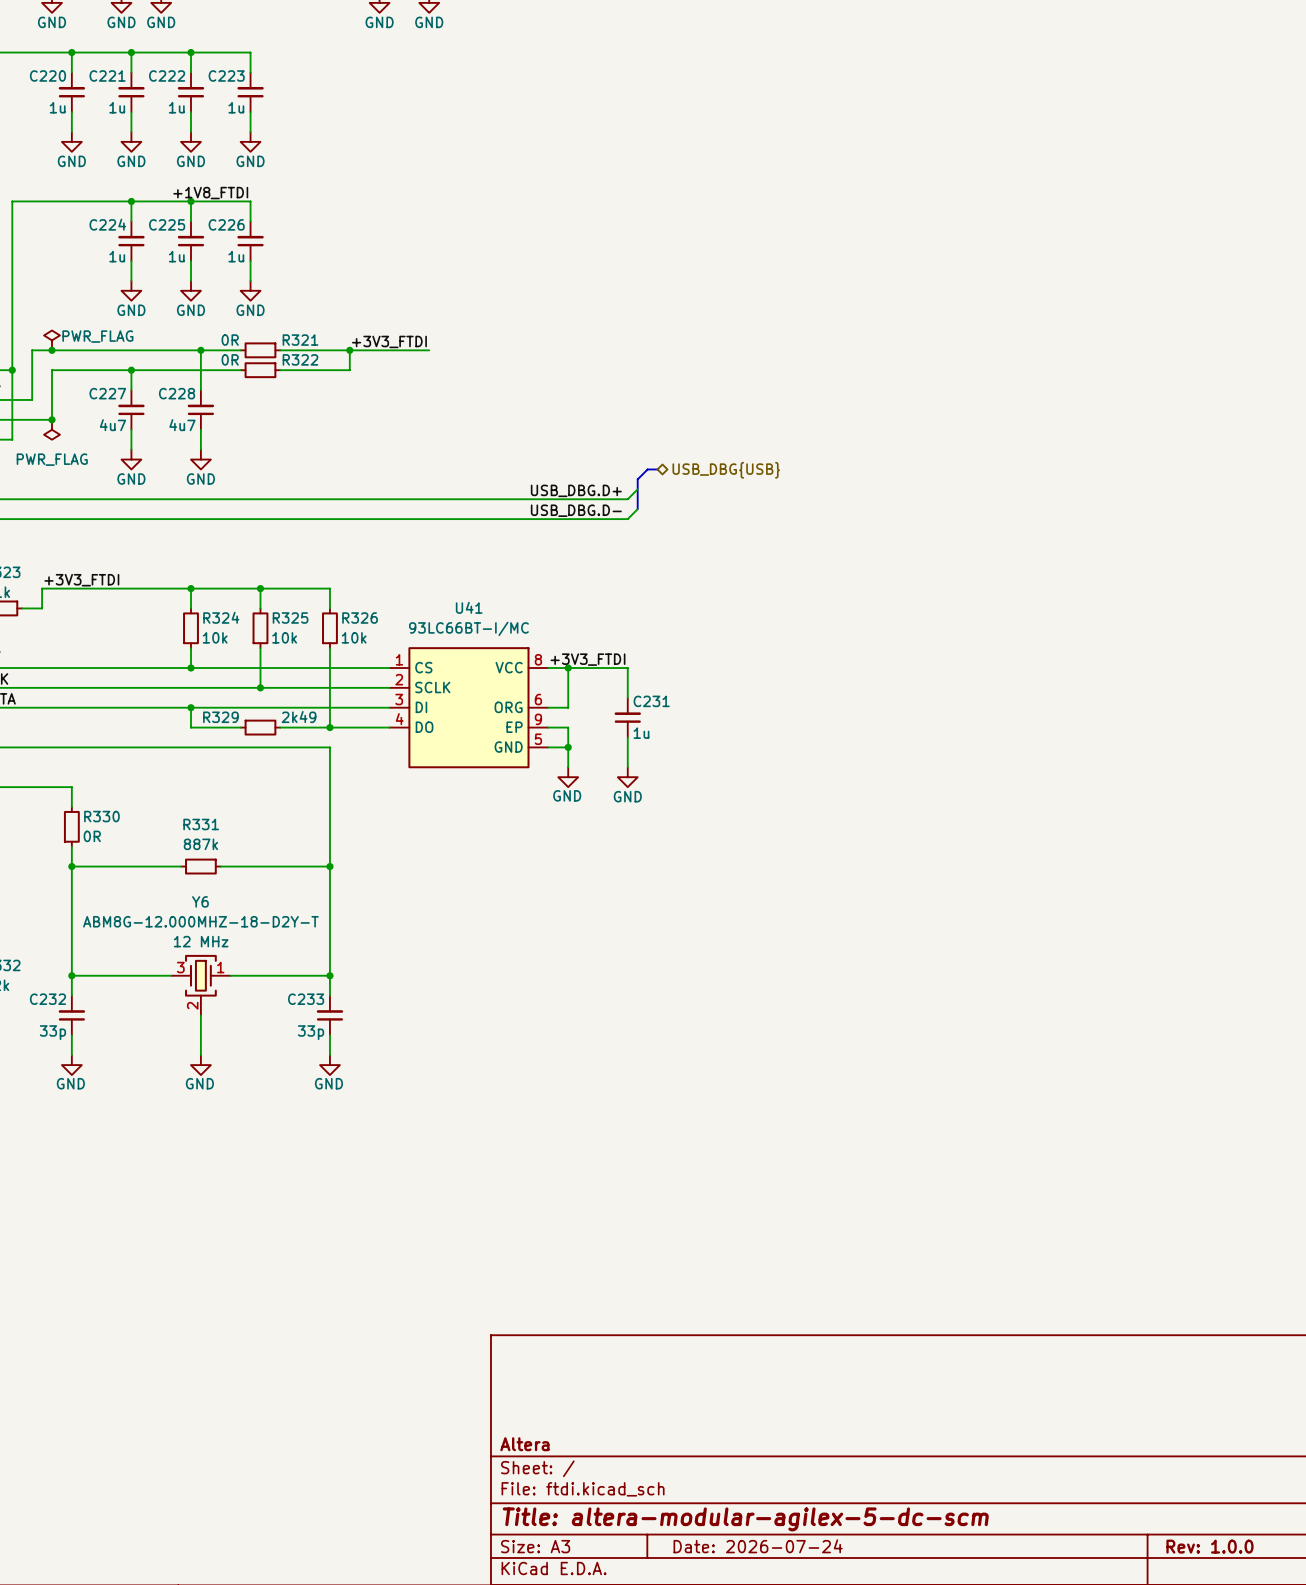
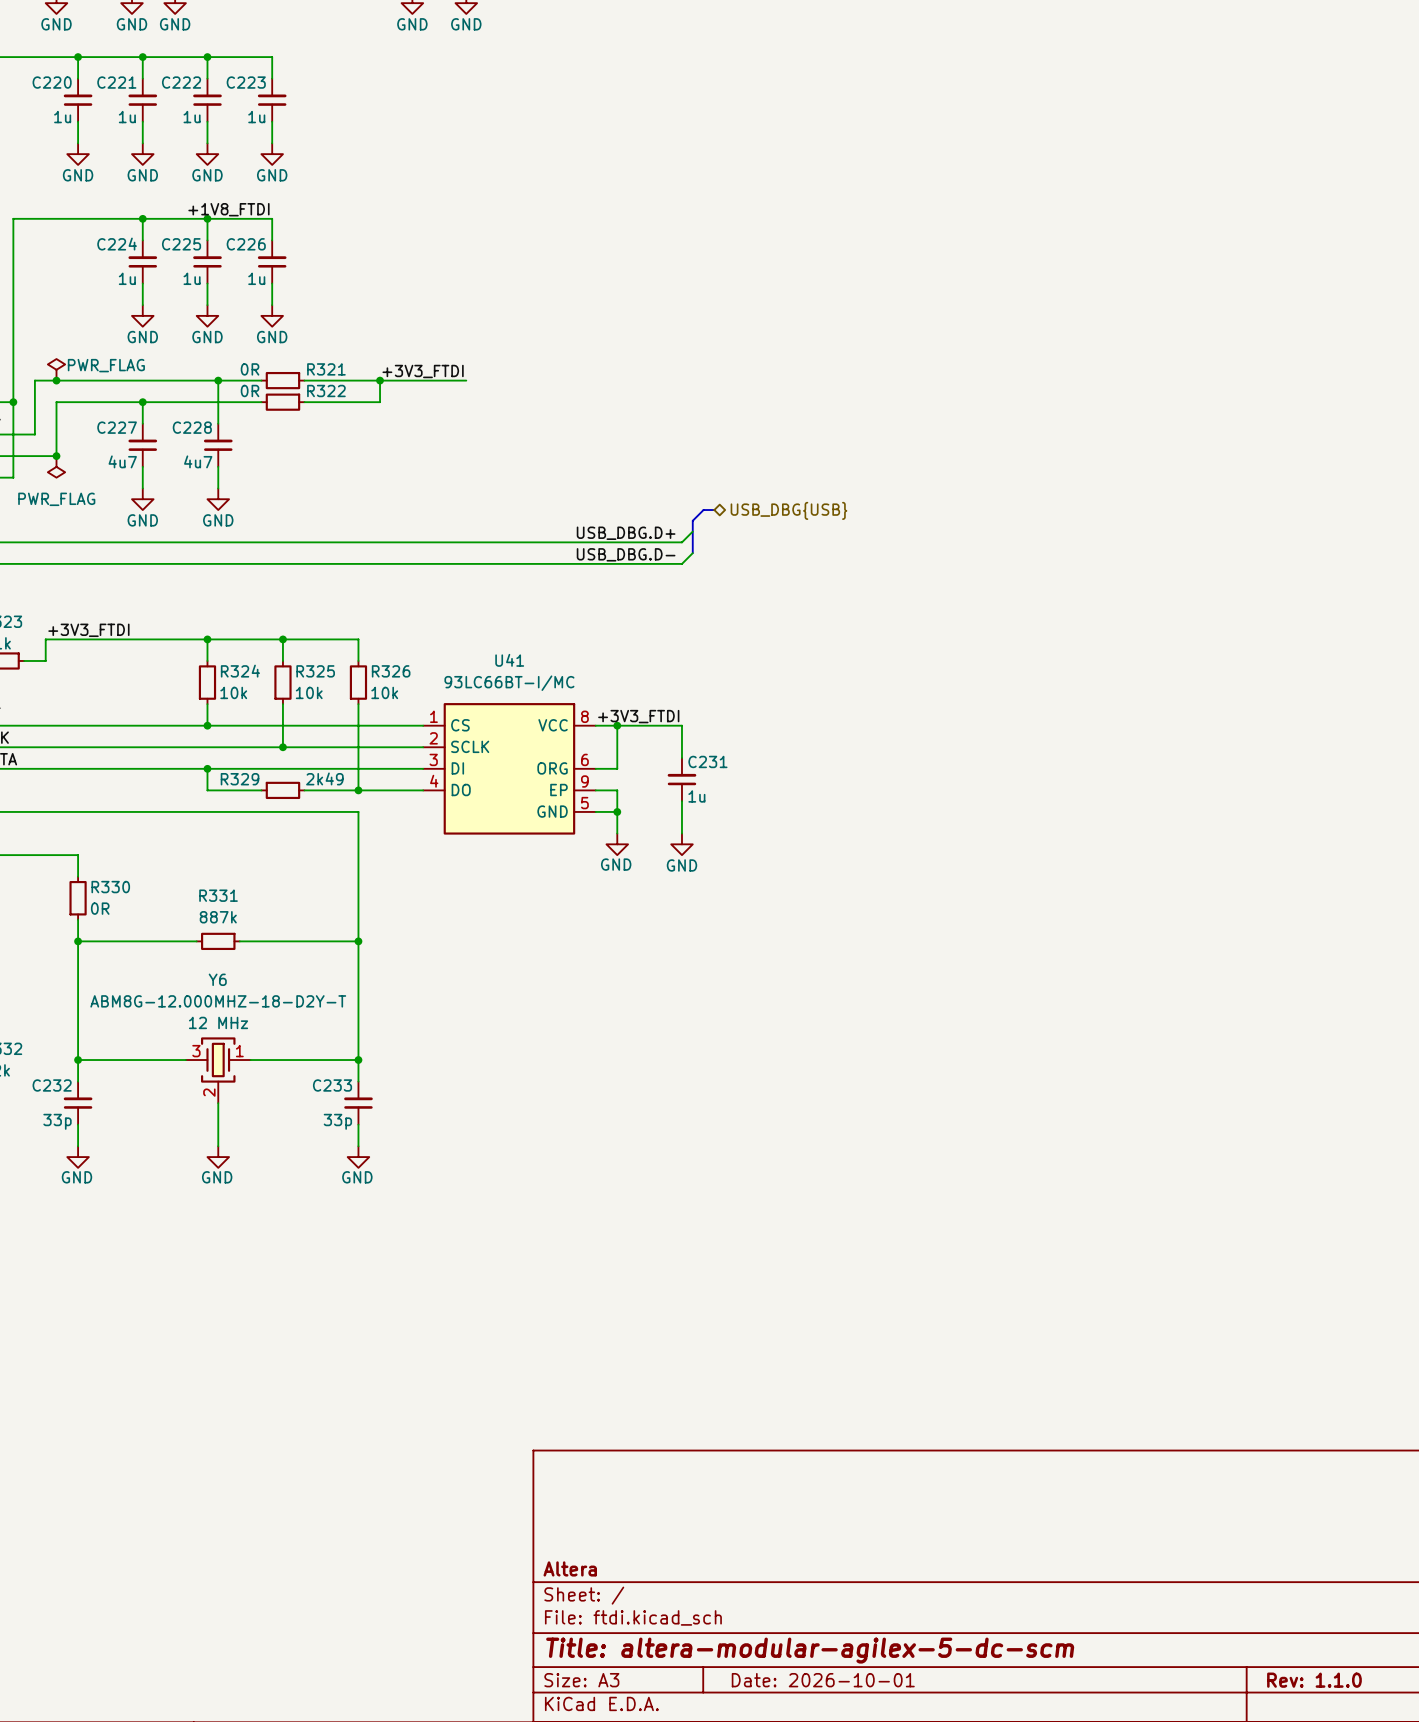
title block: Date: 2026-07-24 (758, 1546) -> Date: 2026-10-01 (823, 1680)
title block: Rev: 1.0.0 (1209, 1546) -> Rev: 1.1.0 (1314, 1680)

